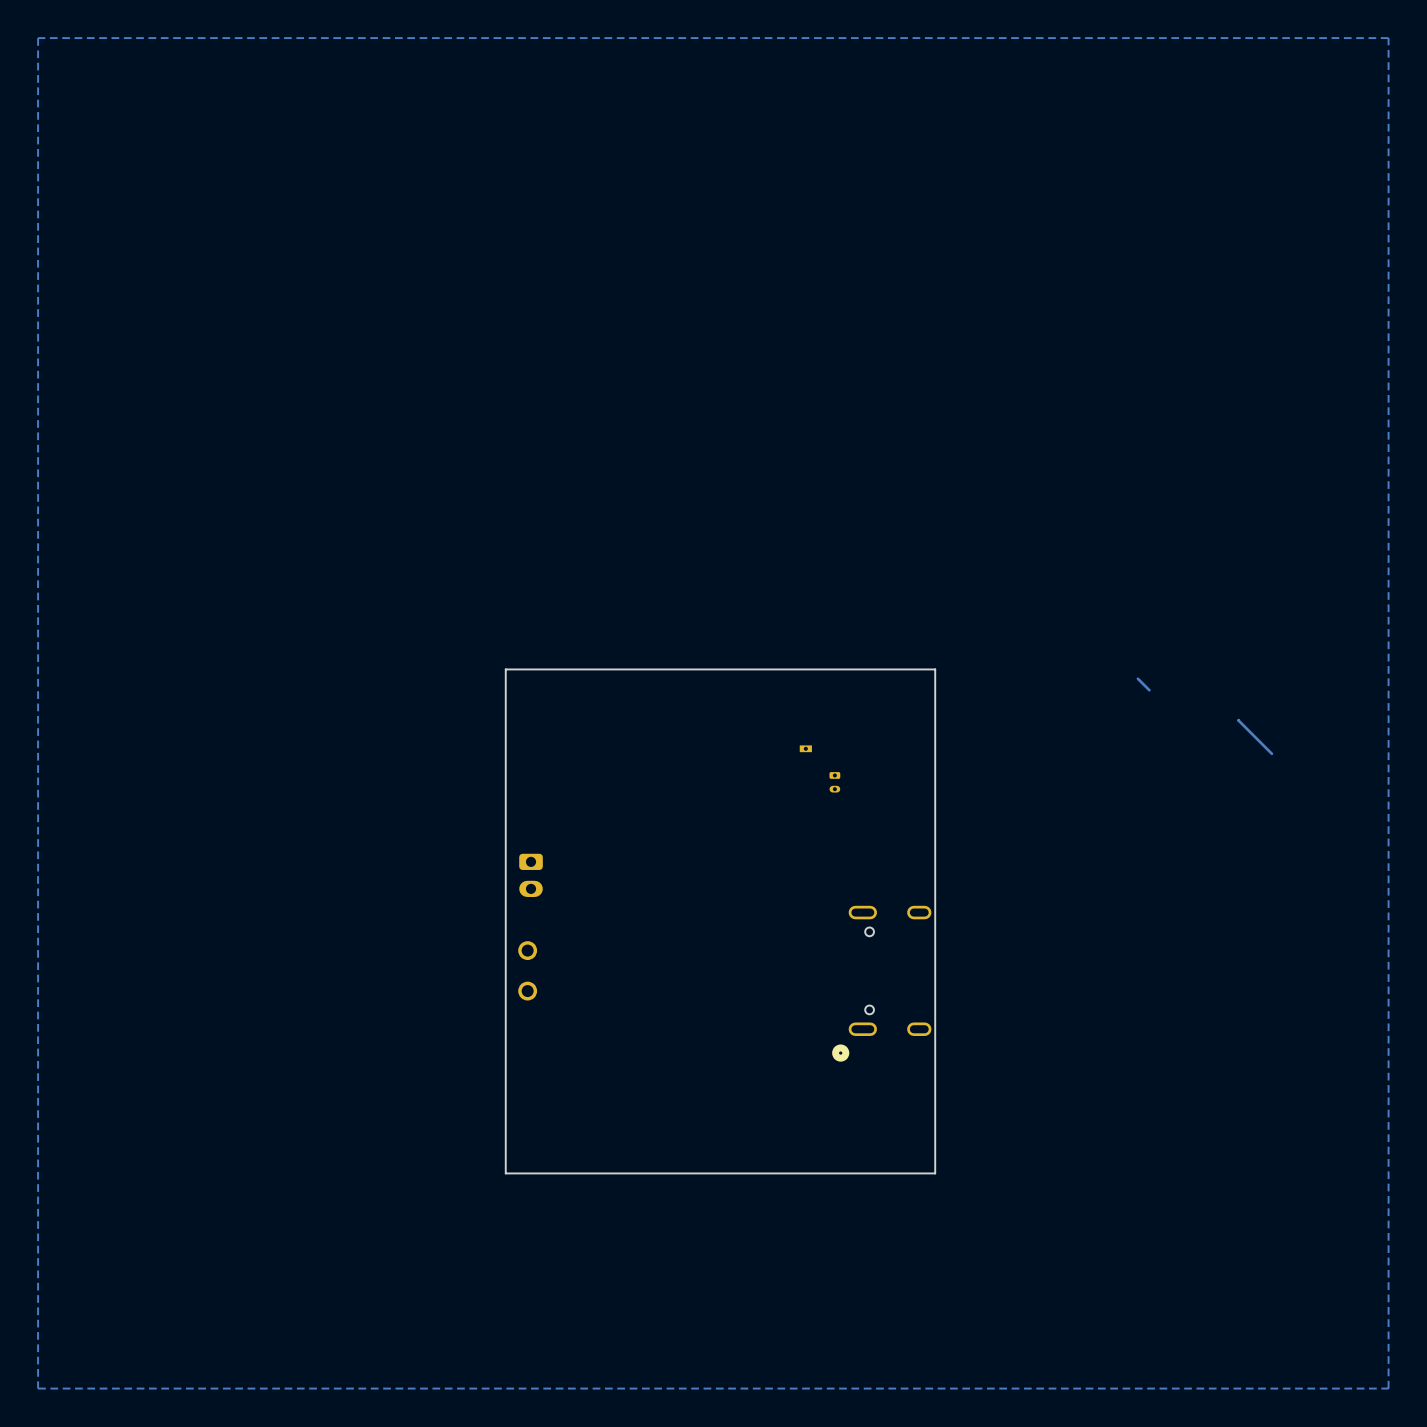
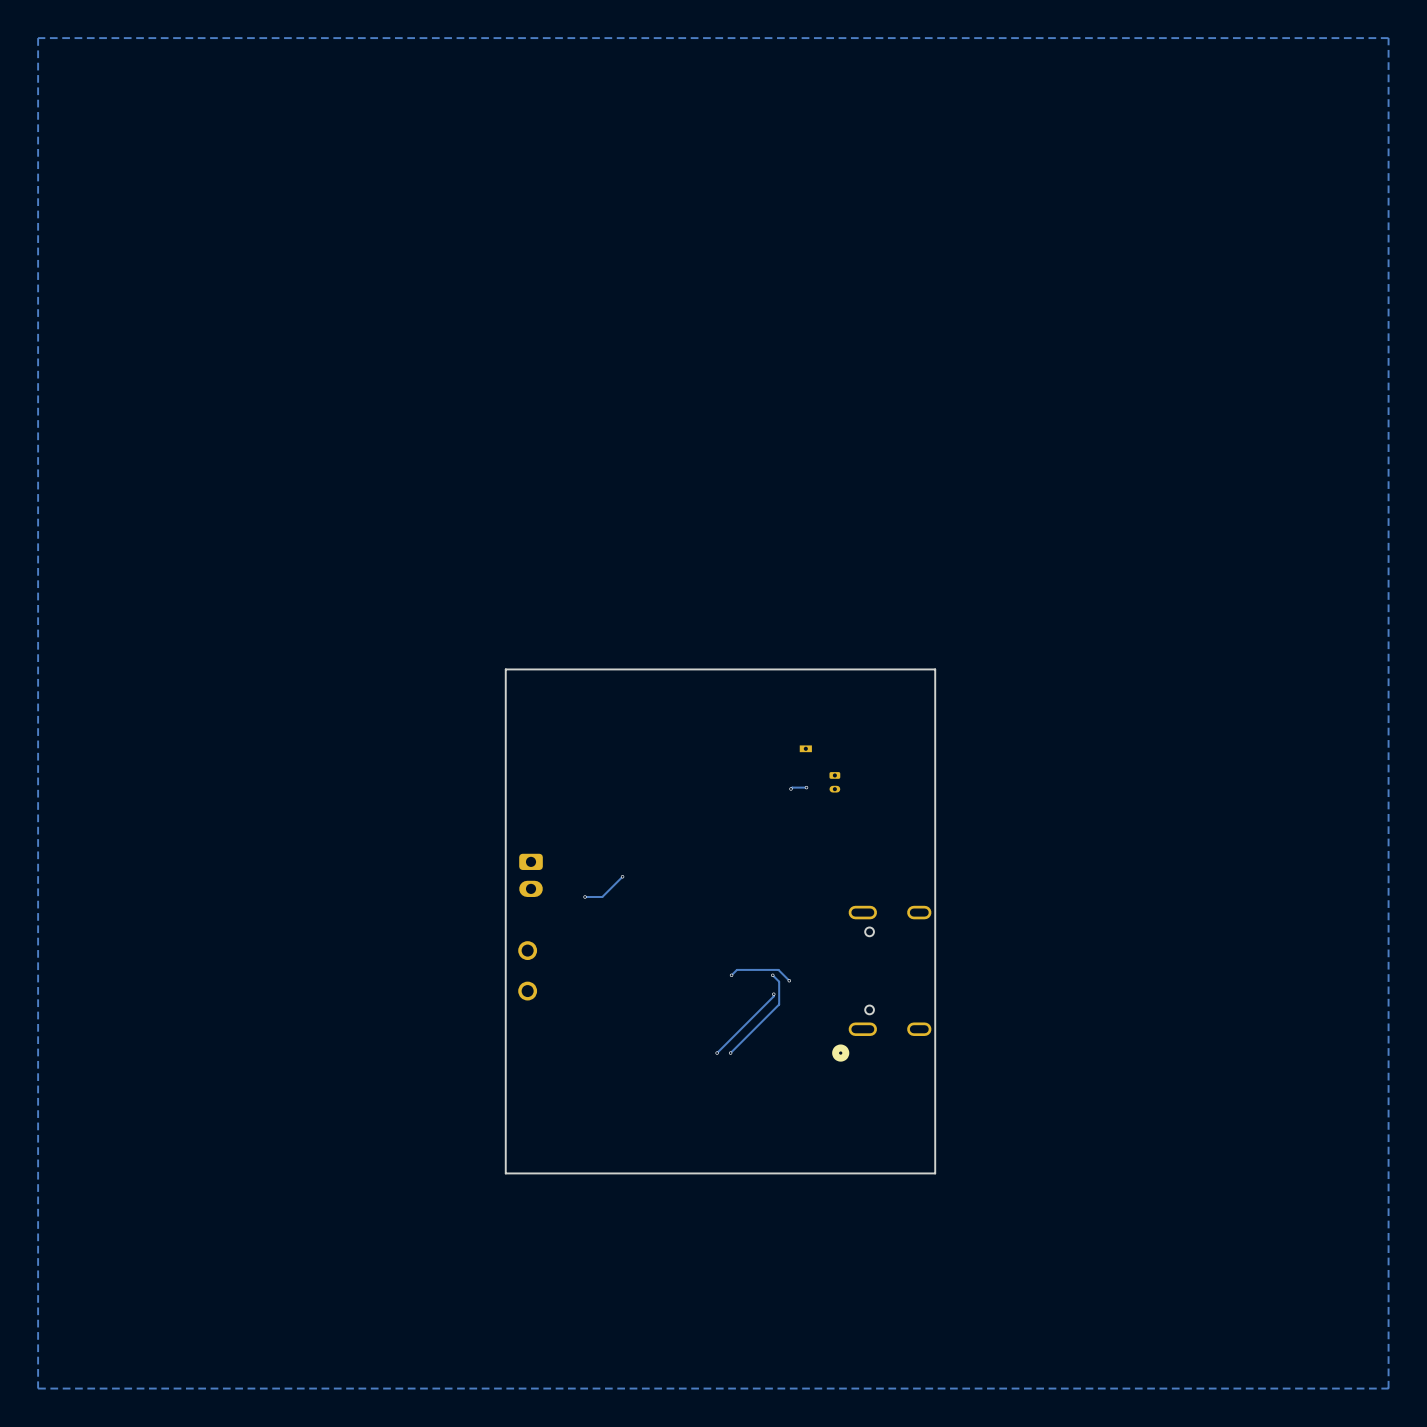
track: (1137, 678) (1149, 690) -> none
track: (1238, 720) (1271, 753) -> none
track: none -> (806, 787) (790, 788)
via: none -> (806, 787)
via: none -> (790, 788)
track: none -> (622, 876) (602, 896) (585, 896)
via: none -> (622, 876)
via: none -> (585, 896)
track: none -> (731, 975) (736, 969) (778, 969) (789, 980)
via: none -> (731, 975)
track: none -> (772, 975) (779, 981) (779, 1004) (730, 1053)
via: none -> (772, 975)
via: none -> (789, 980)
track: none -> (773, 994) (773, 996) (717, 1053)
via: none -> (773, 994)
via: none -> (717, 1053)
via: none -> (730, 1053)

